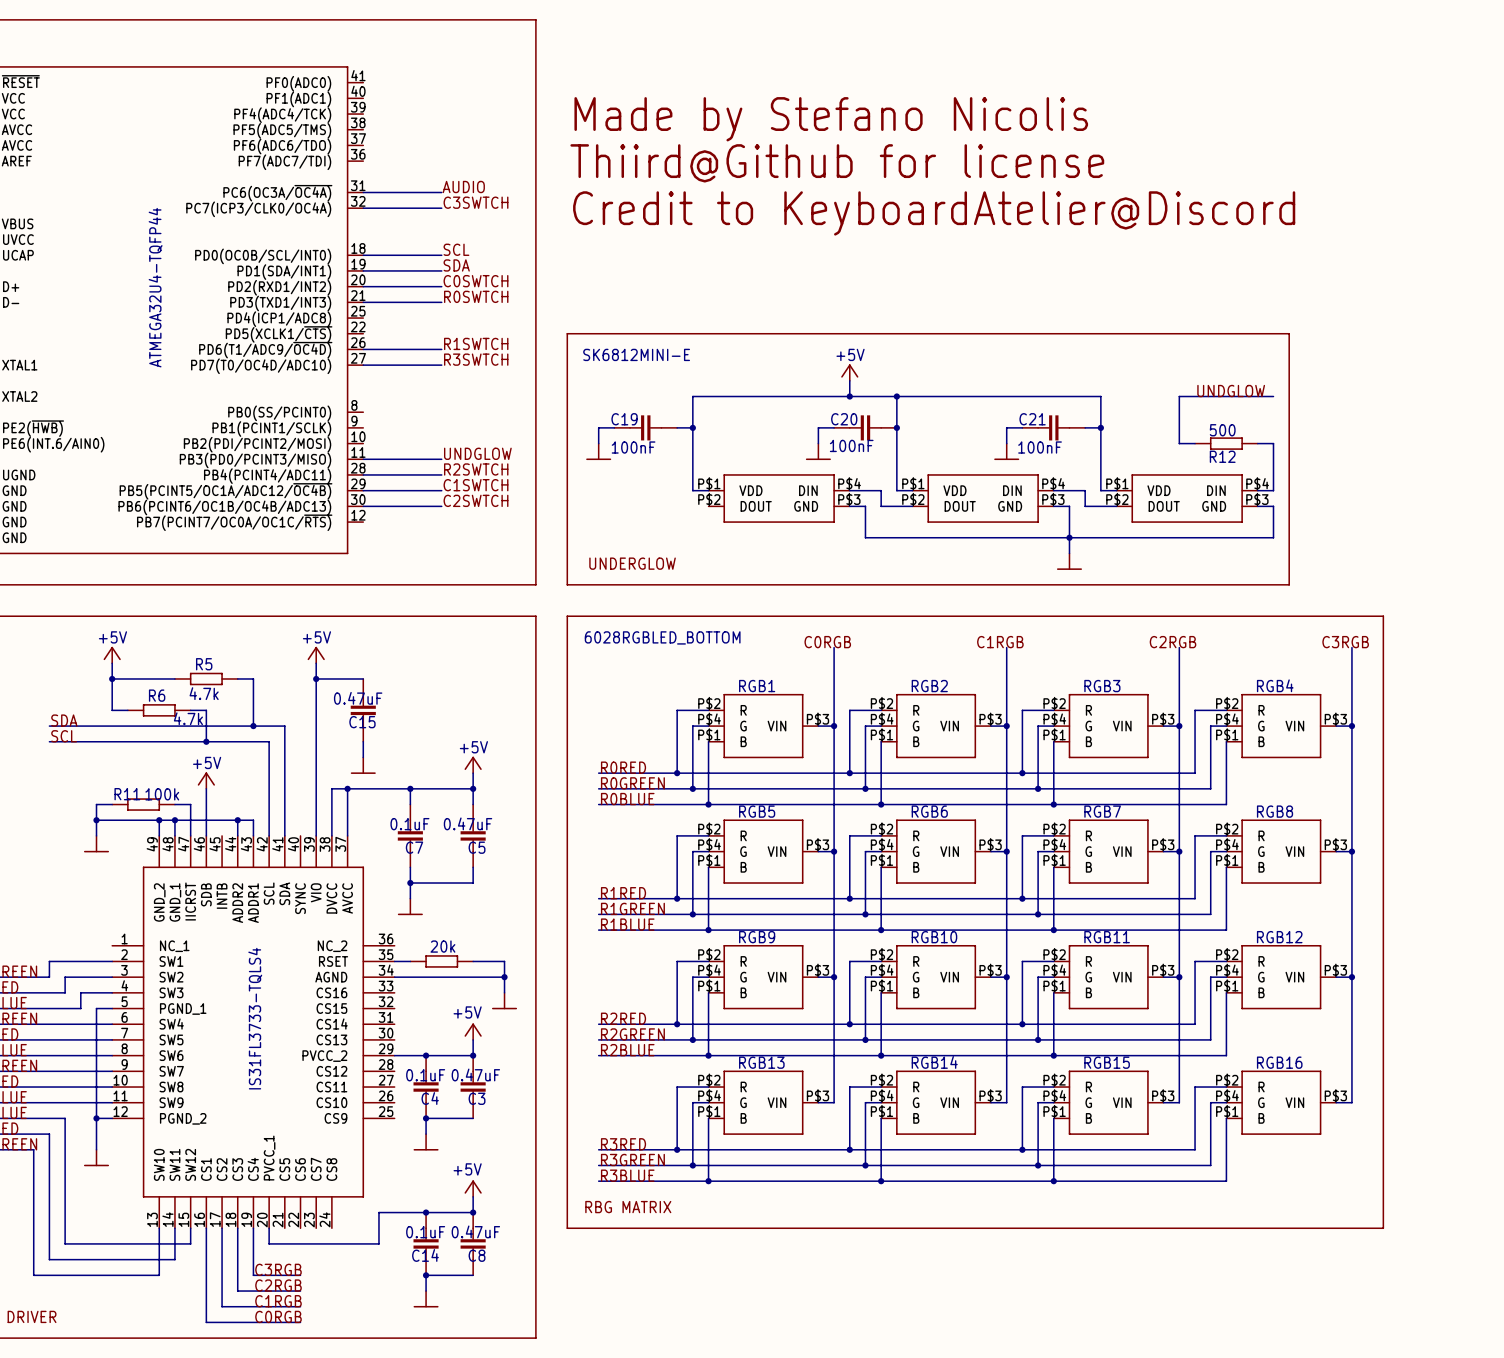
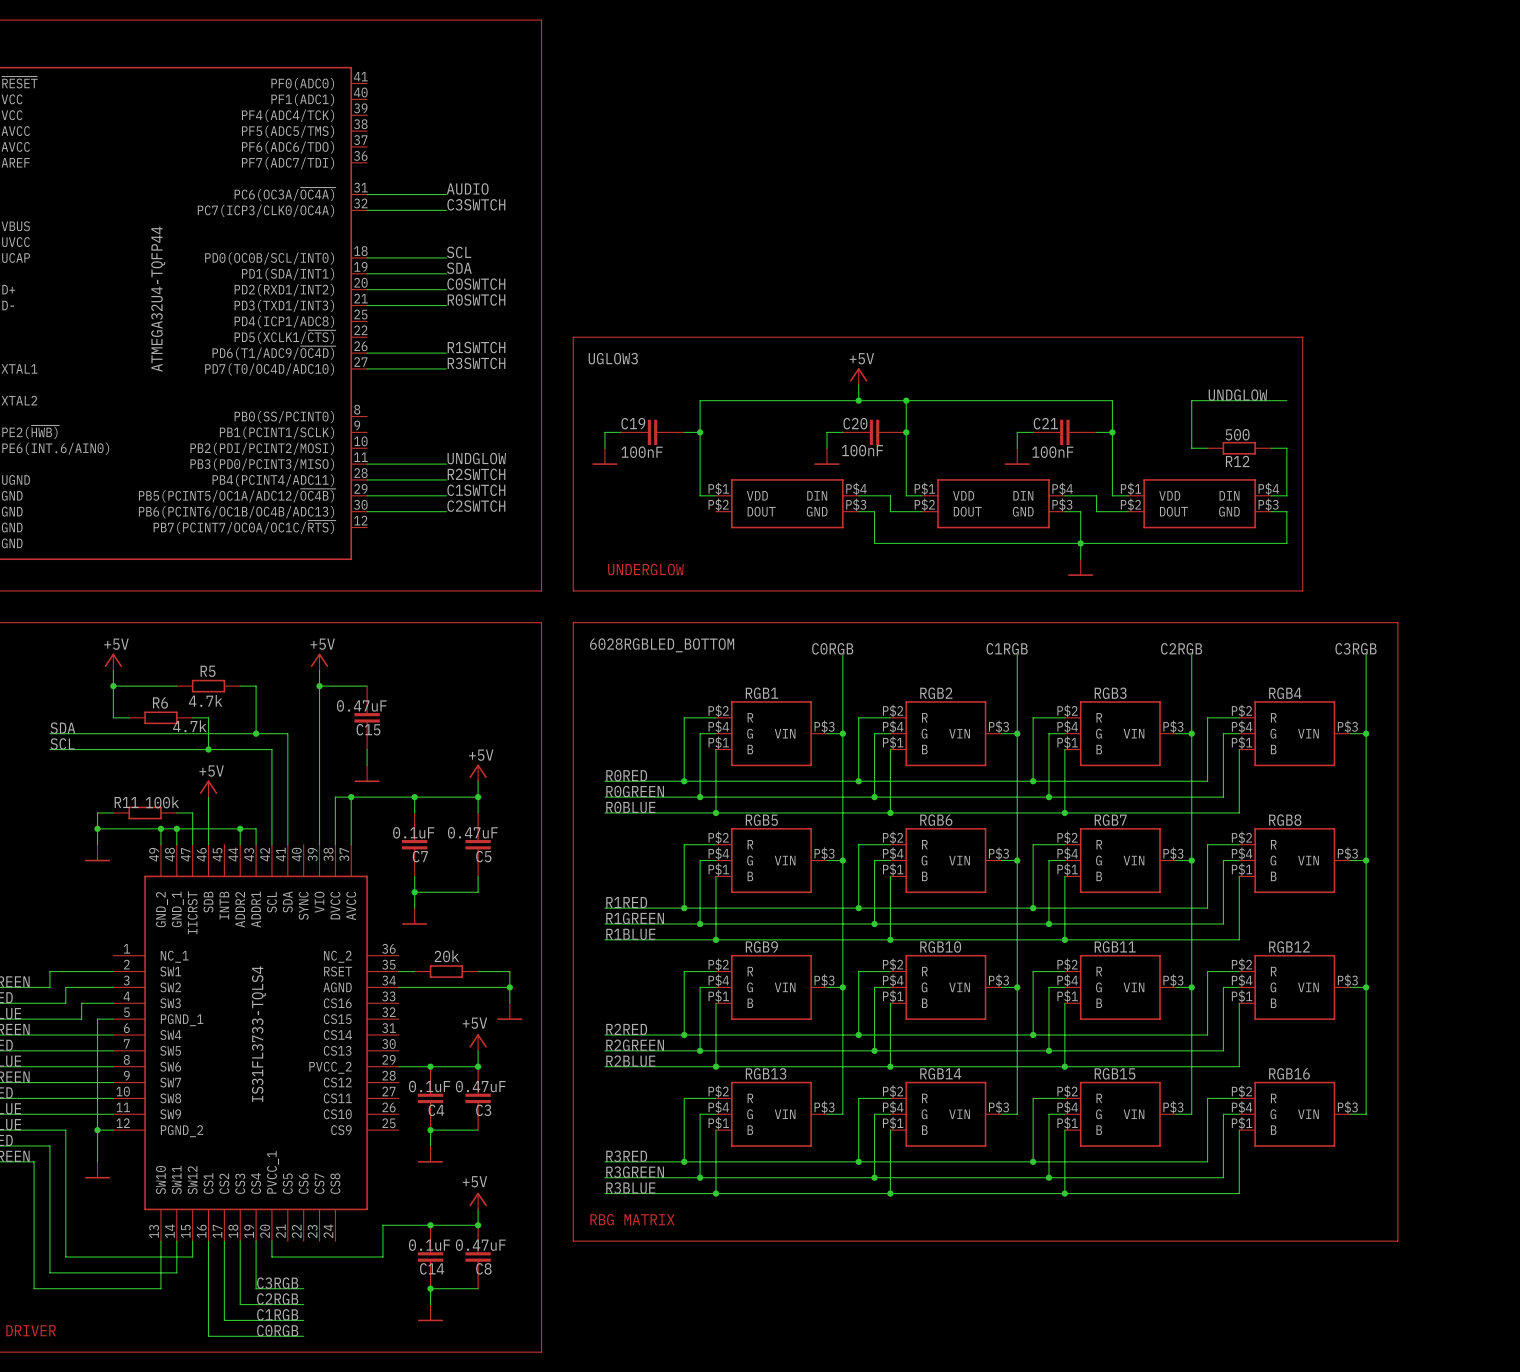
text: Made by Stefano Nicolis (831, 119) -> none
text: Thiird@Github for license (837, 163) -> none
text: Credit to KeyboardAtelier@Discord (934, 213) -> none
SK6812MINI-E name: SK6812MINI-E (636, 354) -> UGLOW3 (613, 358)

